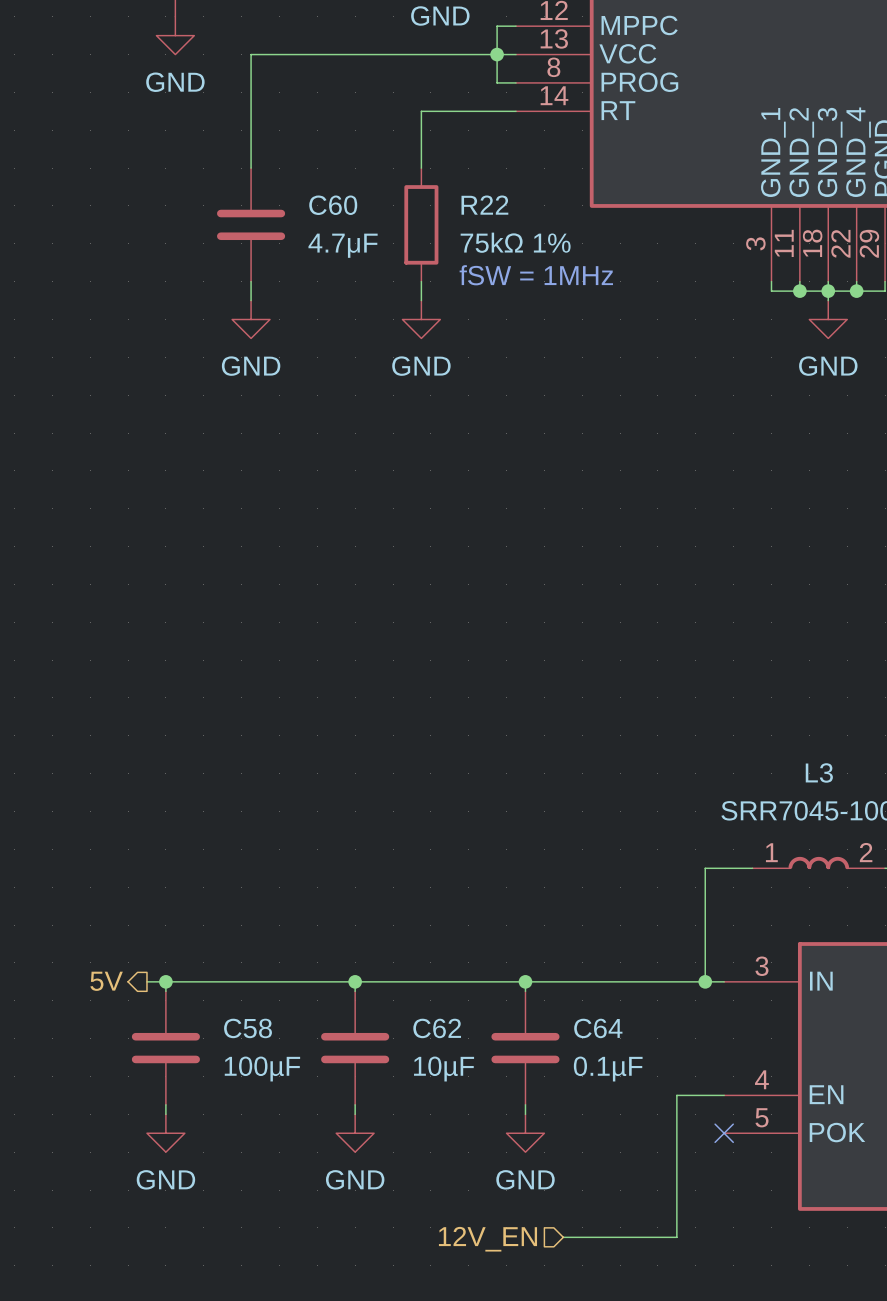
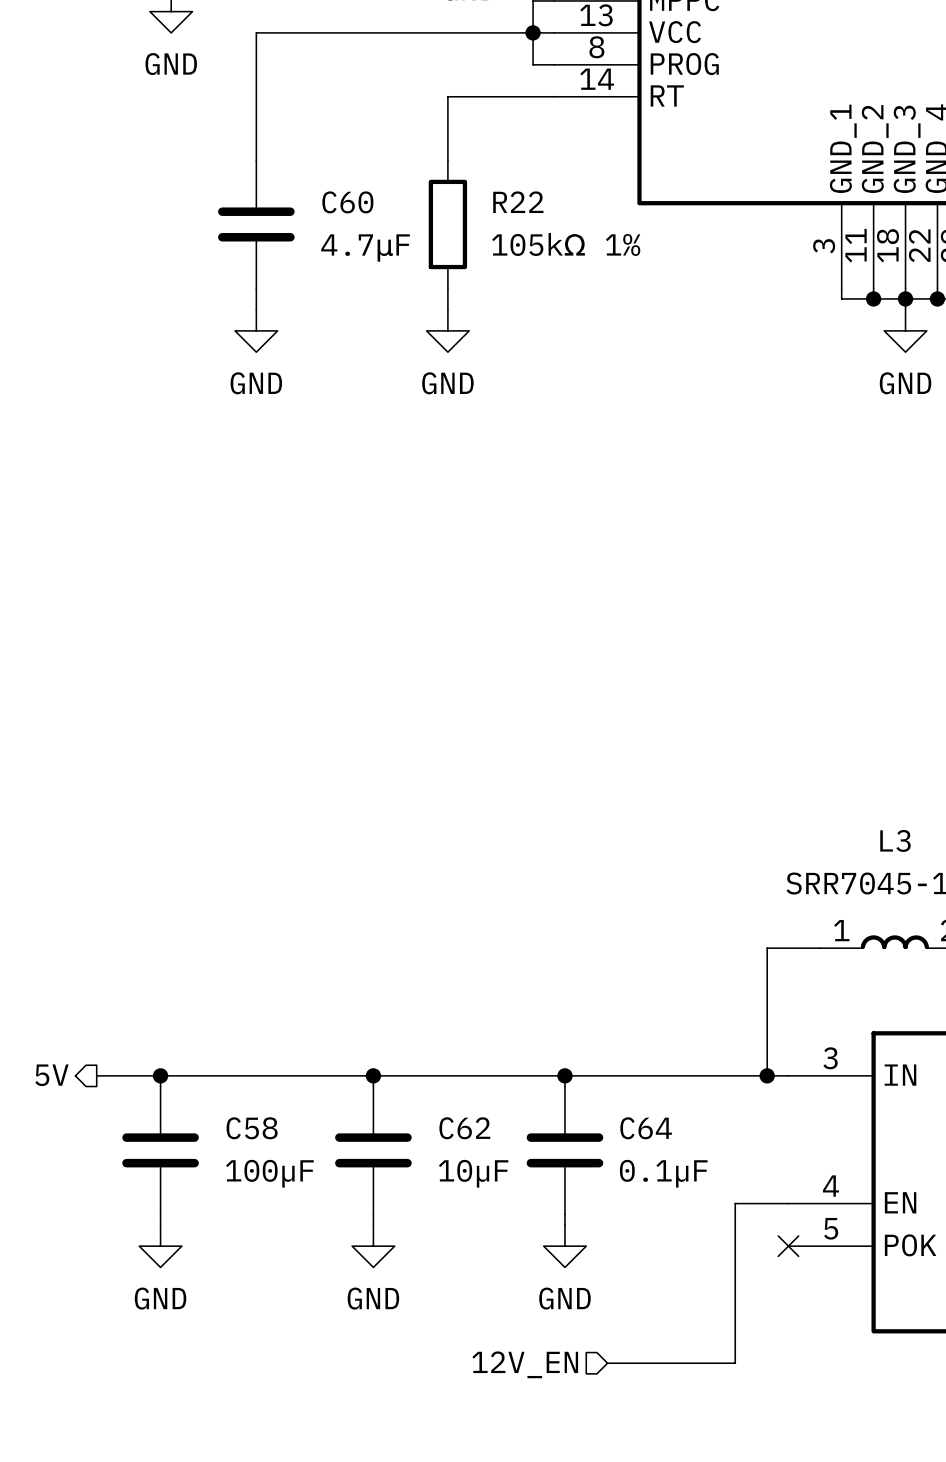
R22 value: 75kΩ 1% (515, 242) -> 105kΩ 1% (566, 244)
text: fSW = 1MHz (536, 275) -> none
hierarchical label position: 5V (106, 981) -> 5V (51, 1075)
wire: none -> (96, 1075) (139, 1075)

